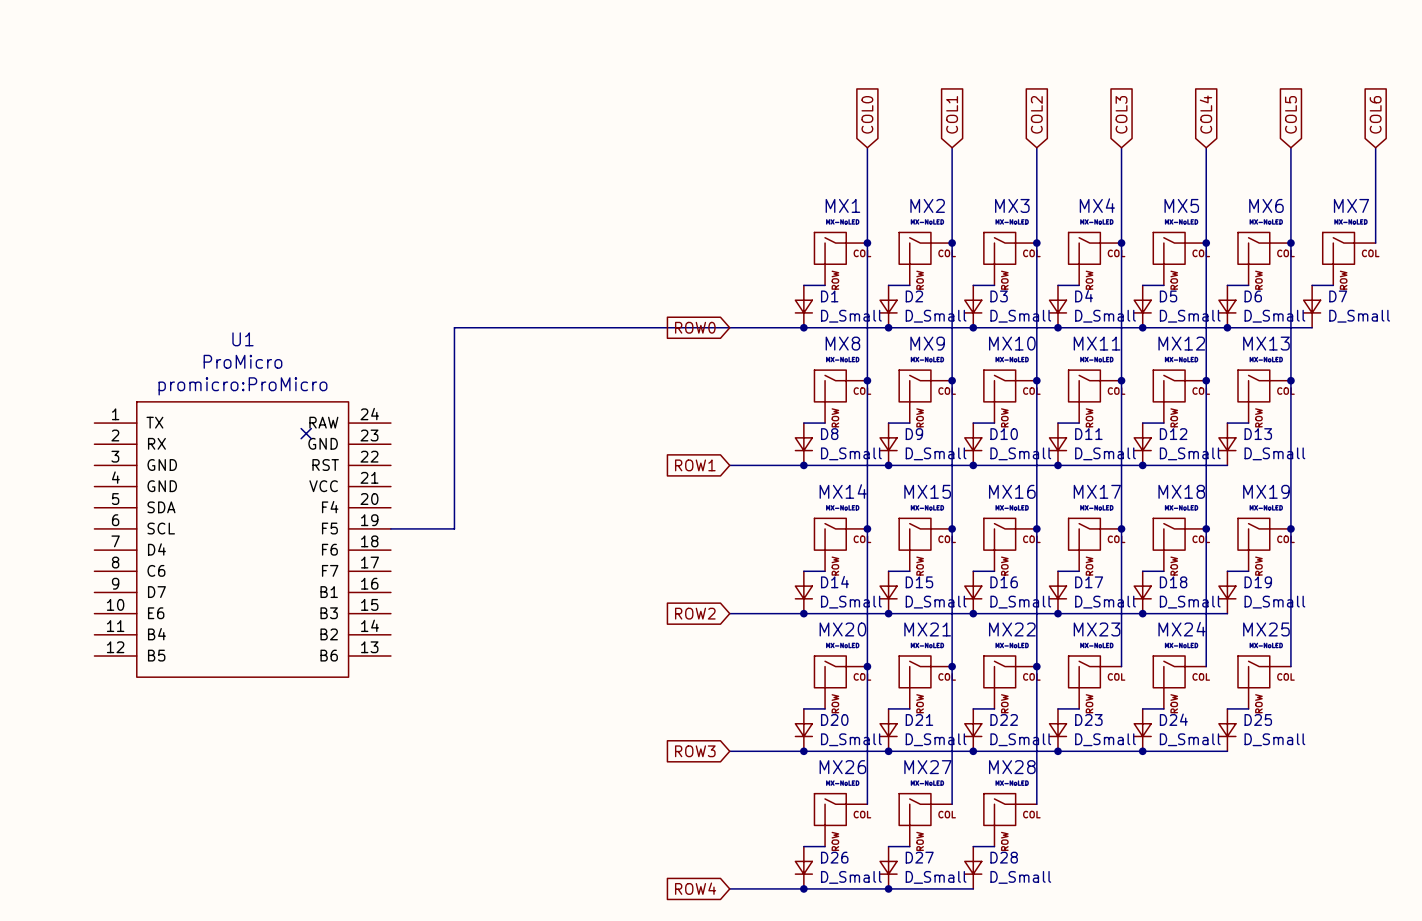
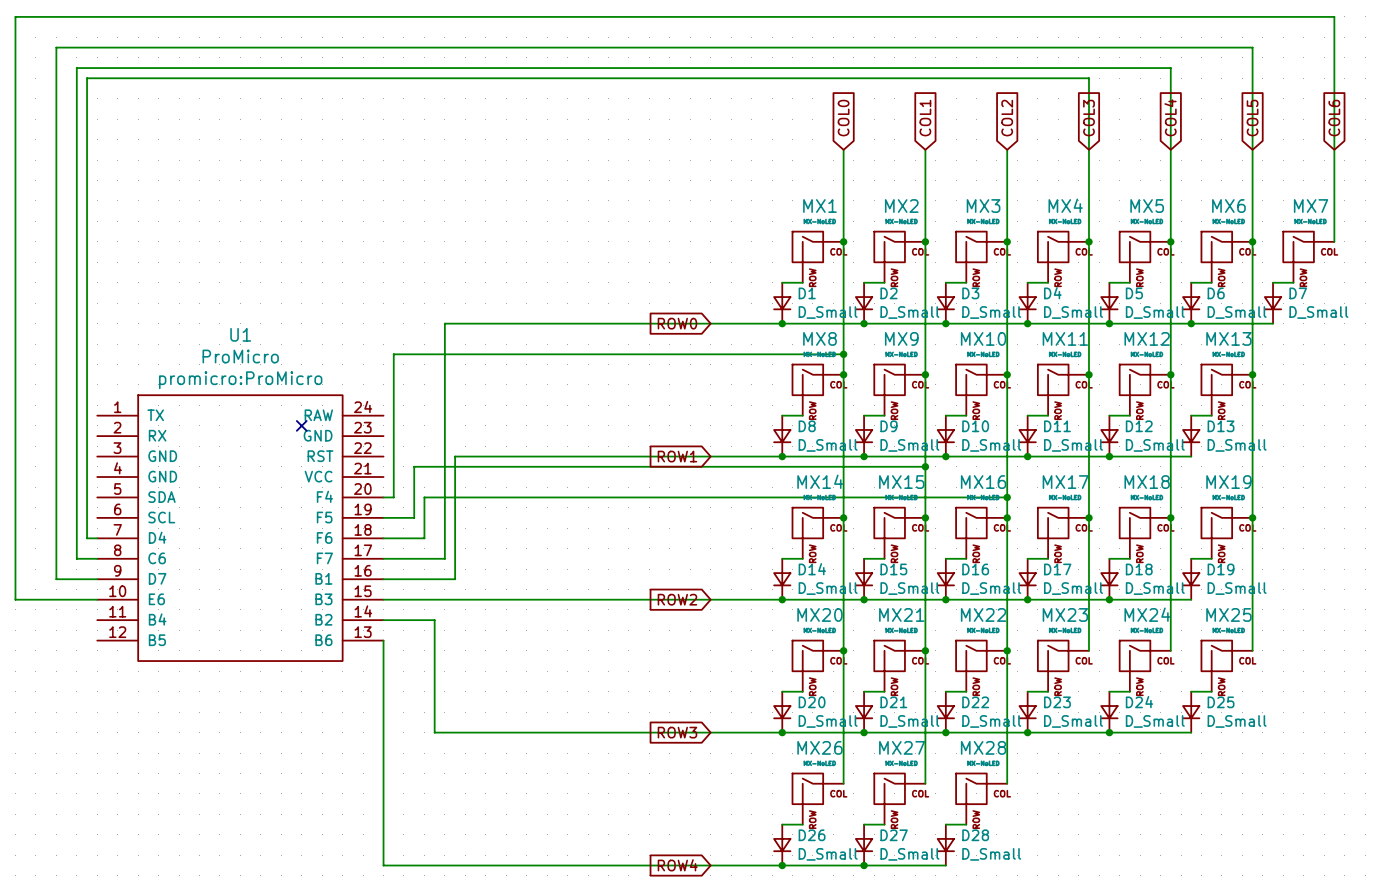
wire: none -> (1088, 149) (1088, 78) (87, 78) (87, 538) (97, 538)
wire: none -> (1170, 149) (1170, 68) (76, 68) (76, 558) (97, 558)
wire: none -> (1252, 149) (1252, 47) (56, 47) (56, 579) (97, 579)
wire: none -> (1334, 149) (1334, 16) (15, 16) (15, 599) (97, 599)
wire: none -> (843, 354) (393, 354) (393, 497) (383, 497)
junction: none -> (843, 354)
wire: none -> (710, 456) (455, 456) (455, 579) (383, 579)
wire: none -> (925, 466) (414, 466) (414, 517)
junction: none -> (925, 466)
wire: none -> (1007, 497) (424, 497) (424, 538) (383, 538)
junction: none -> (1007, 497)
wire: (422, 528) (454, 528) -> (383, 558) (444, 558) (444, 517)
wire: none -> (383, 599) (710, 599)
wire: none -> (383, 620) (434, 620) (434, 732) (710, 732)
wire: none -> (383, 640) (383, 865) (710, 865)

